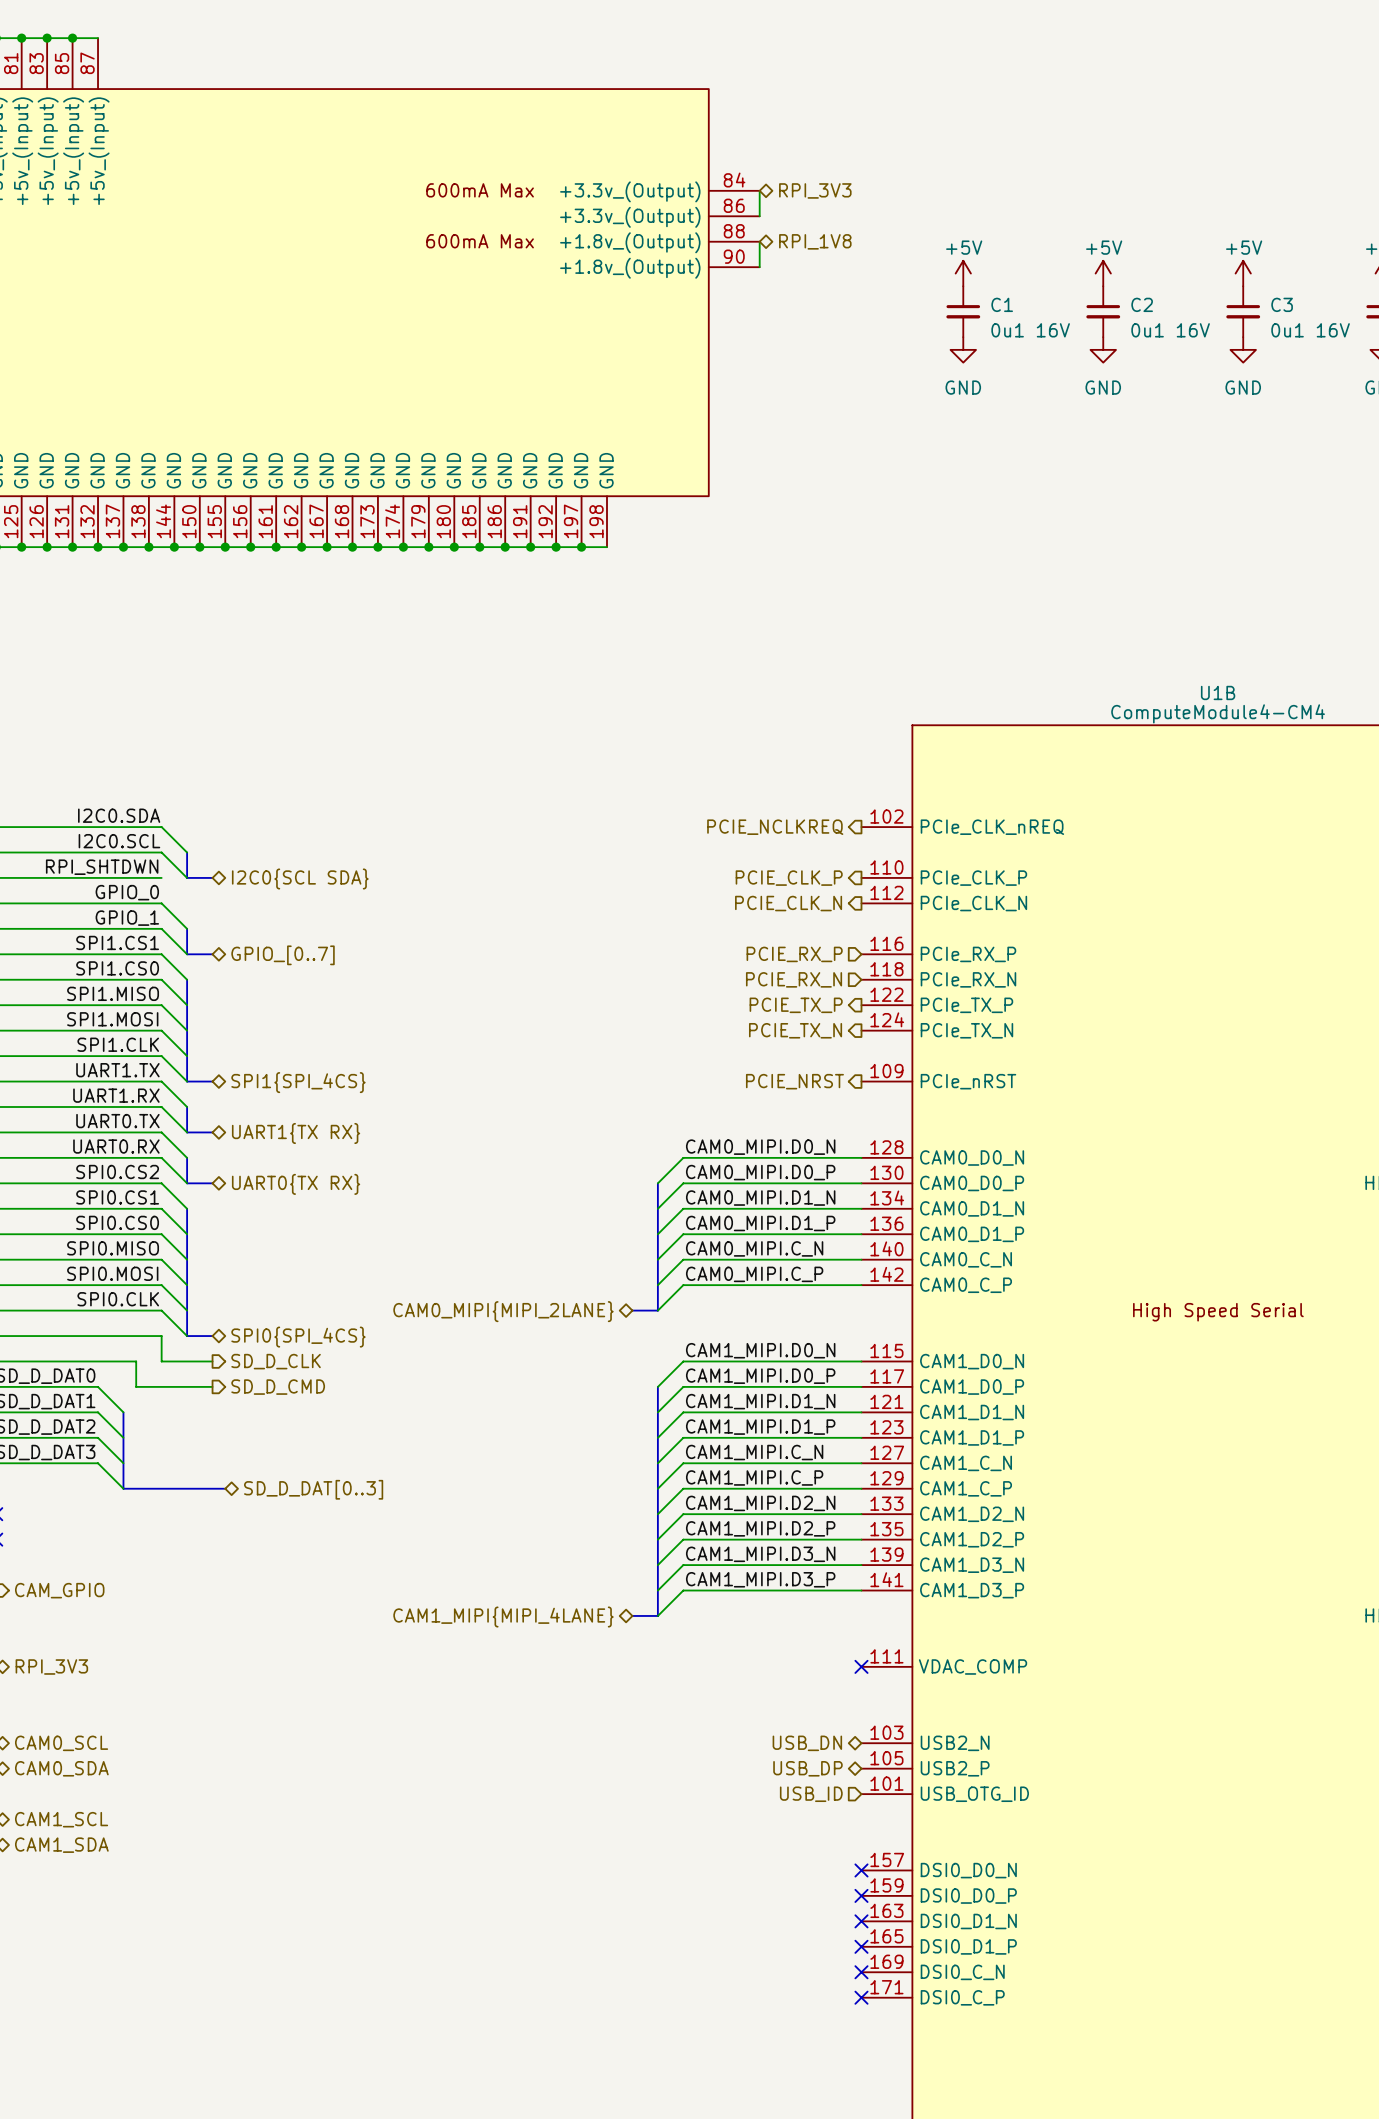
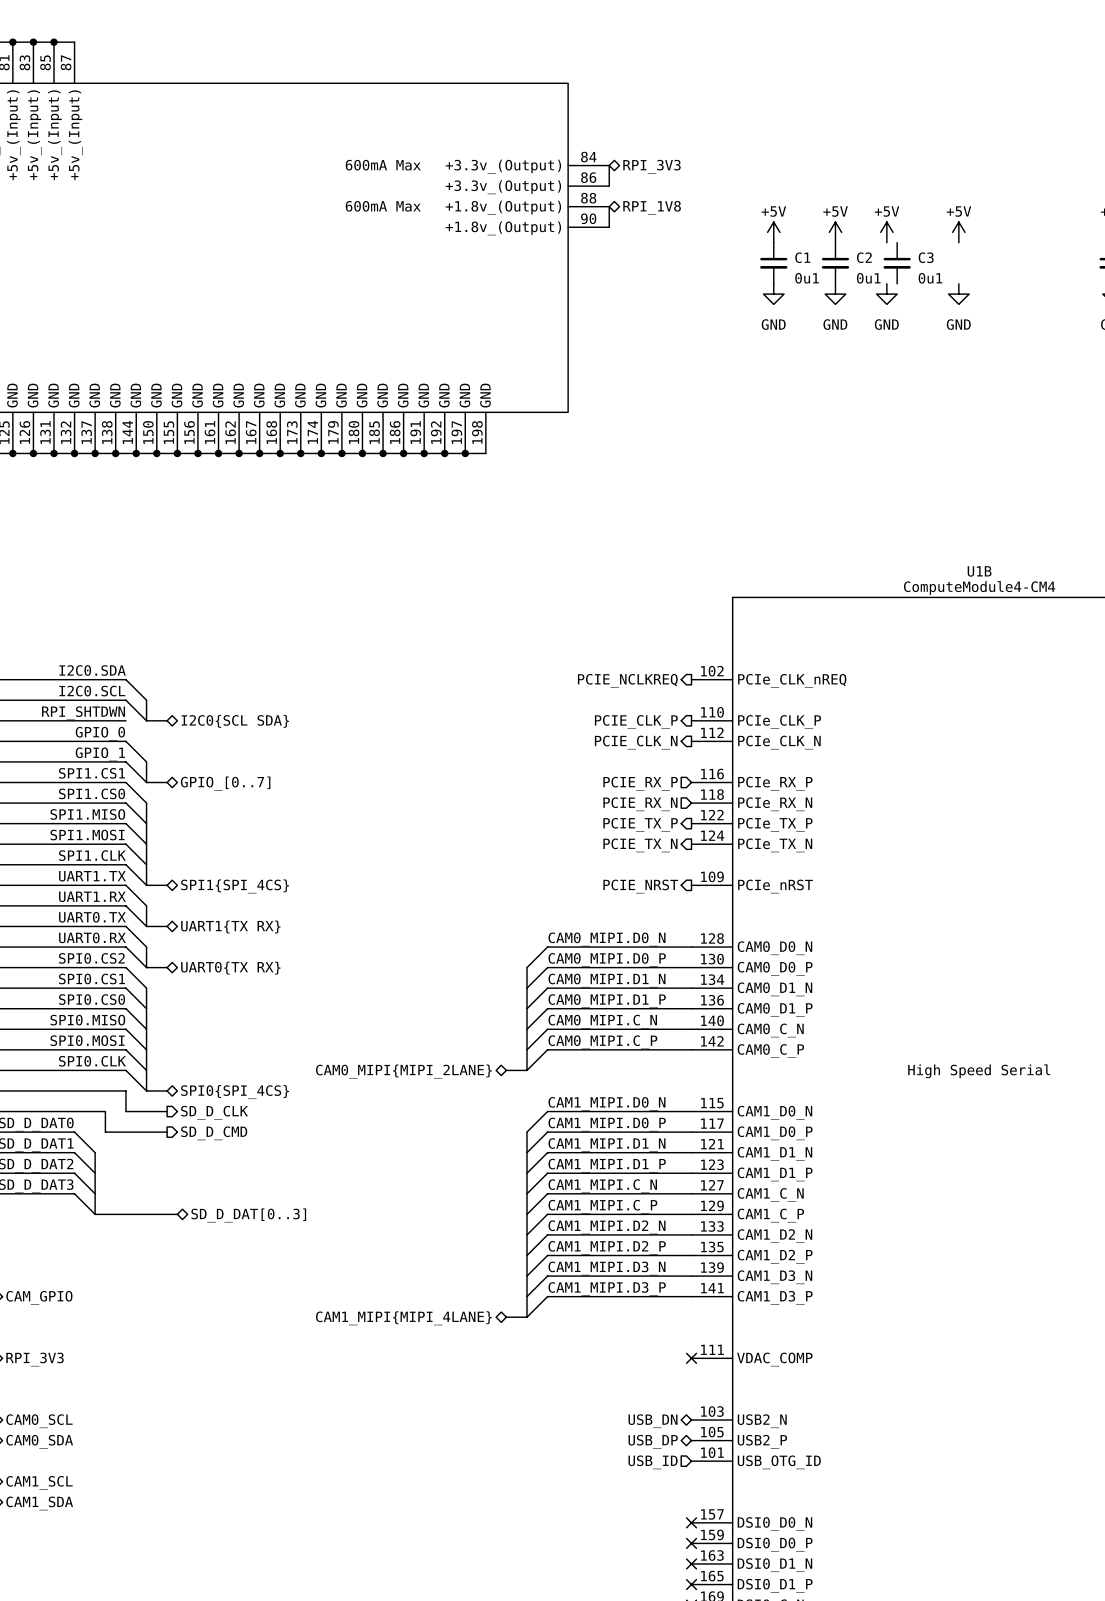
power symbol: none -> +5V (835, 232)
power symbol position: +5V (1243, 273) -> +5V (958, 232)
C2 position: (1103, 311) -> (835, 263)
C3 position: (1243, 311) -> (897, 263)
C1 value: 0u1 16V (1030, 330) -> 0u1 (807, 278)
C2 value: 0u1 16V (1170, 330) -> 0u1 (868, 278)
C3 value: 0u1 16V (1310, 330) -> 0u1 (930, 278)
power symbol: none -> GND (835, 294)
power symbol position: GND (1243, 349) -> GND (958, 294)

